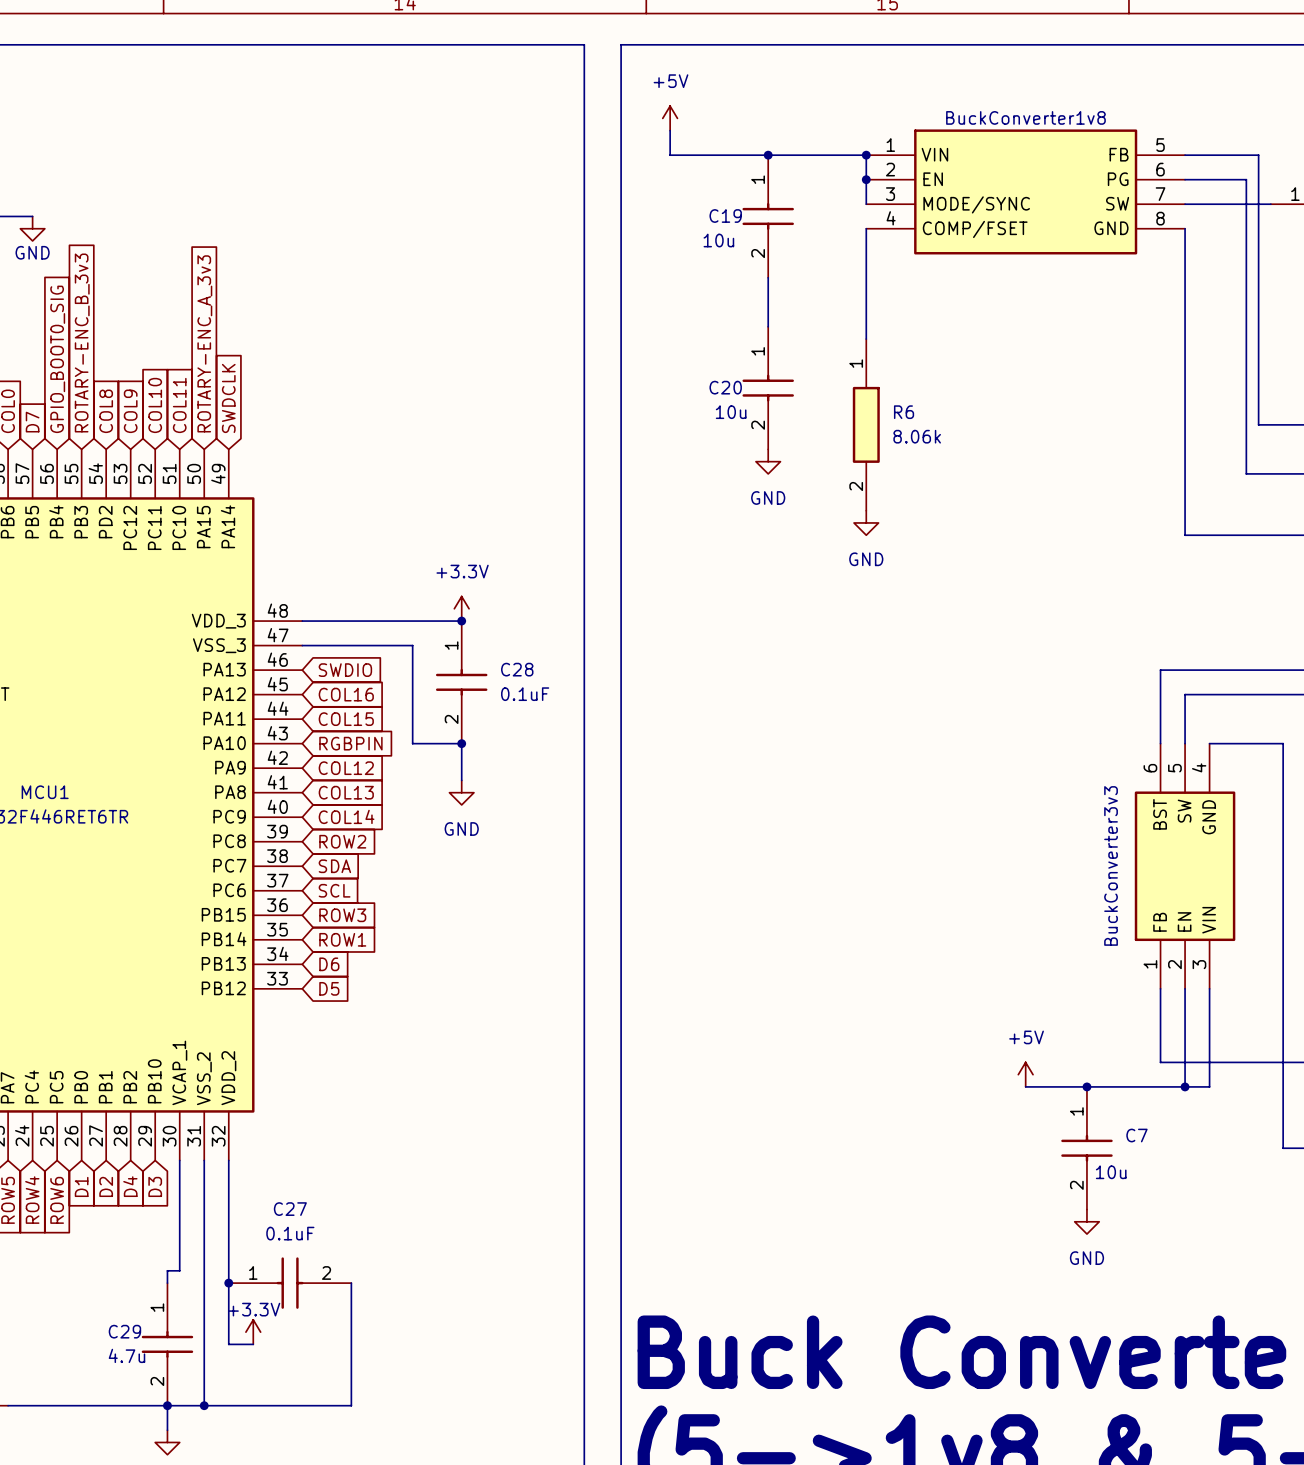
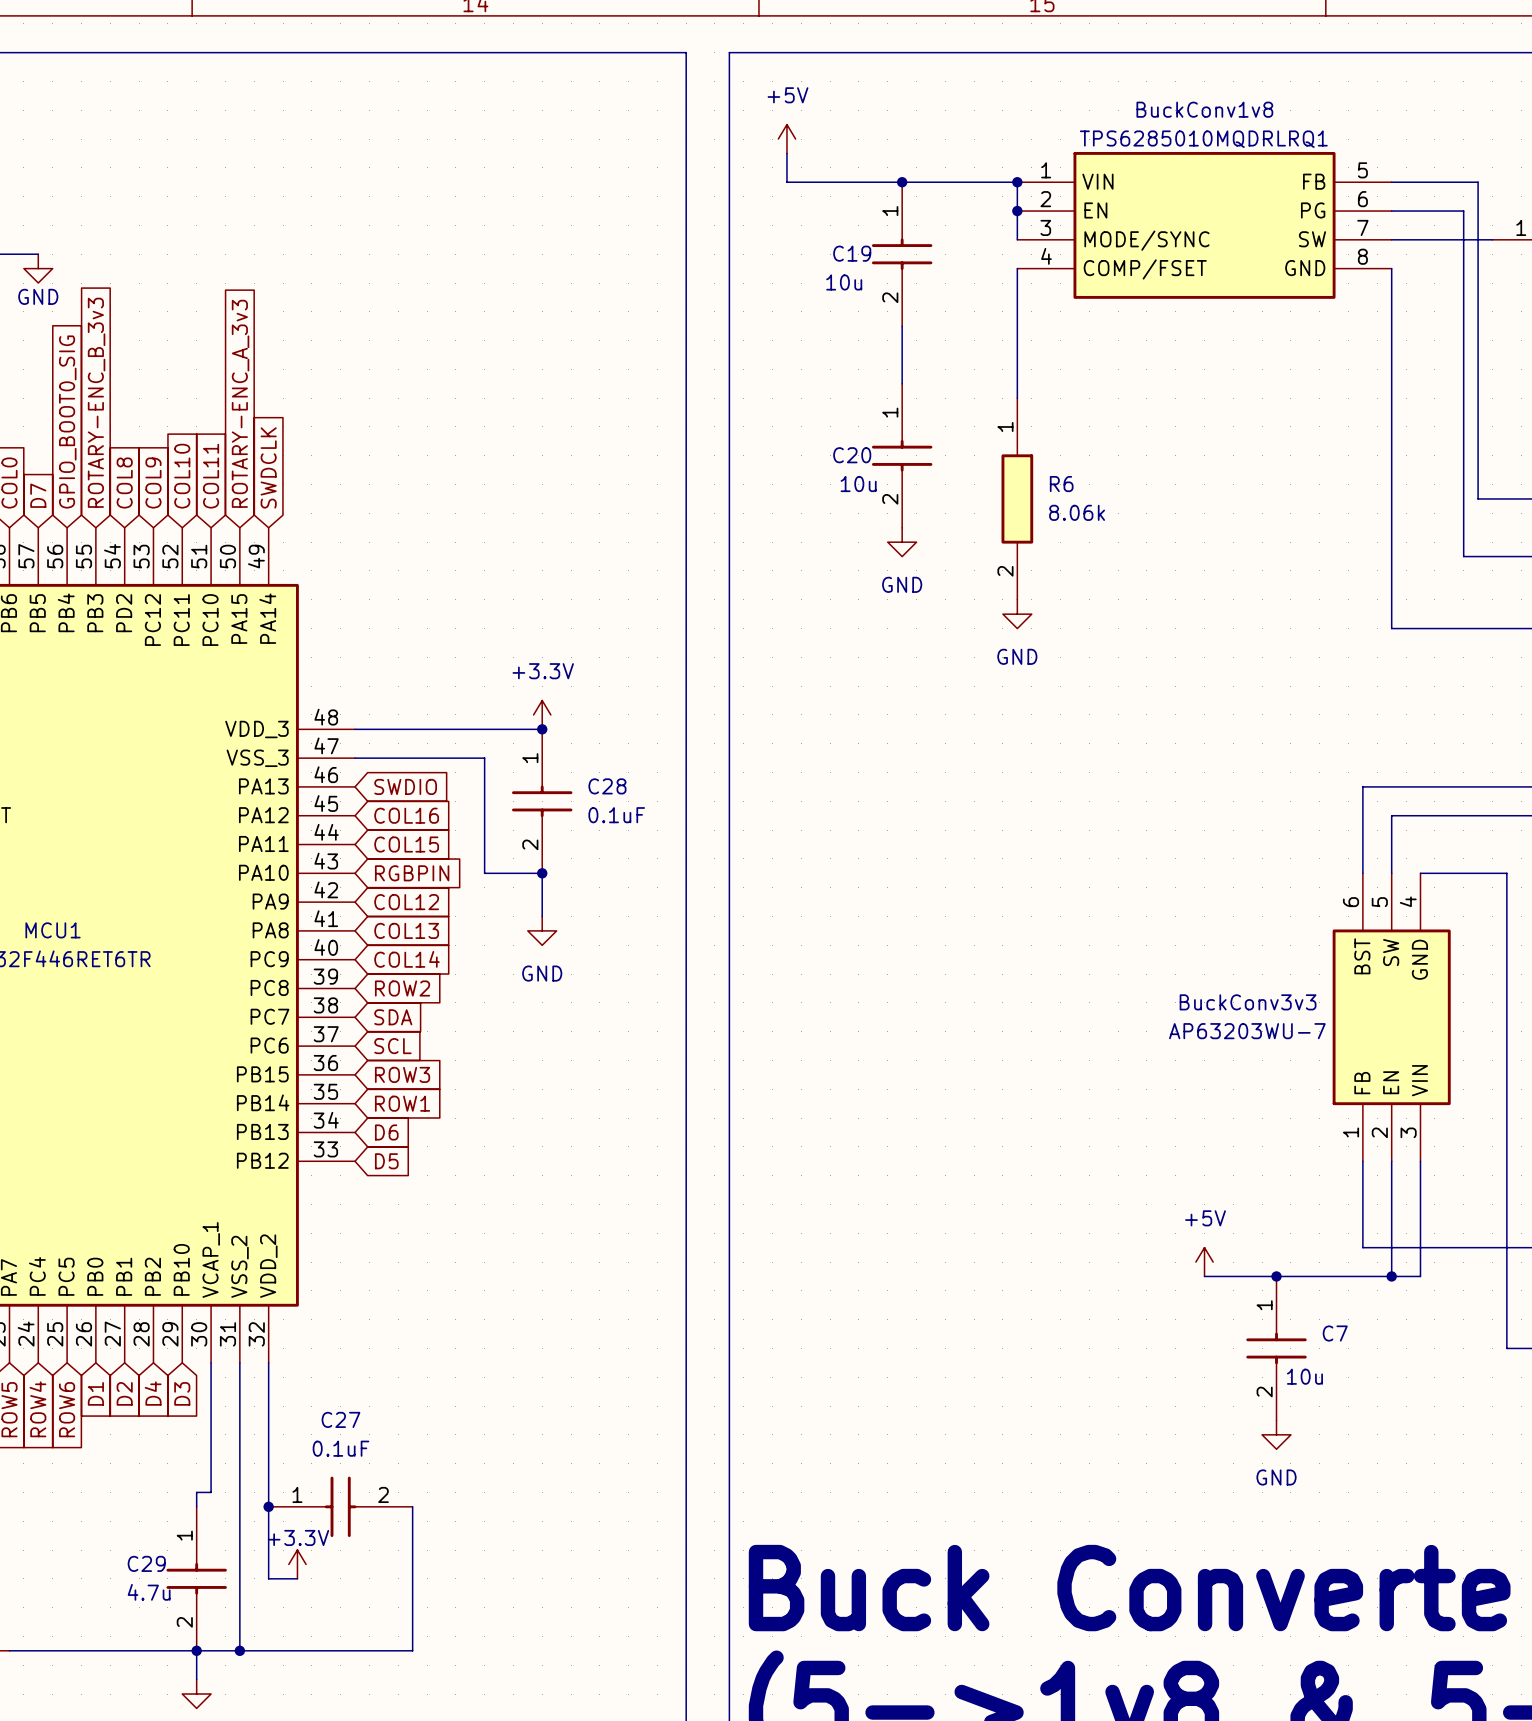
BuckConverter1v8 name: BuckConverter1v8 (1025, 117) -> BuckConv1v8 (1204, 109)
BuckConverter1v8 value: none -> TPS6285010MQDRLRQ1 (1203, 139)
BuckConverter3v3 name: BuckConverter3v3 (1111, 865) -> BuckConv3v3 (1248, 1002)
BuckConverter3v3 value: none -> AP63203WU-7 (1247, 1031)

